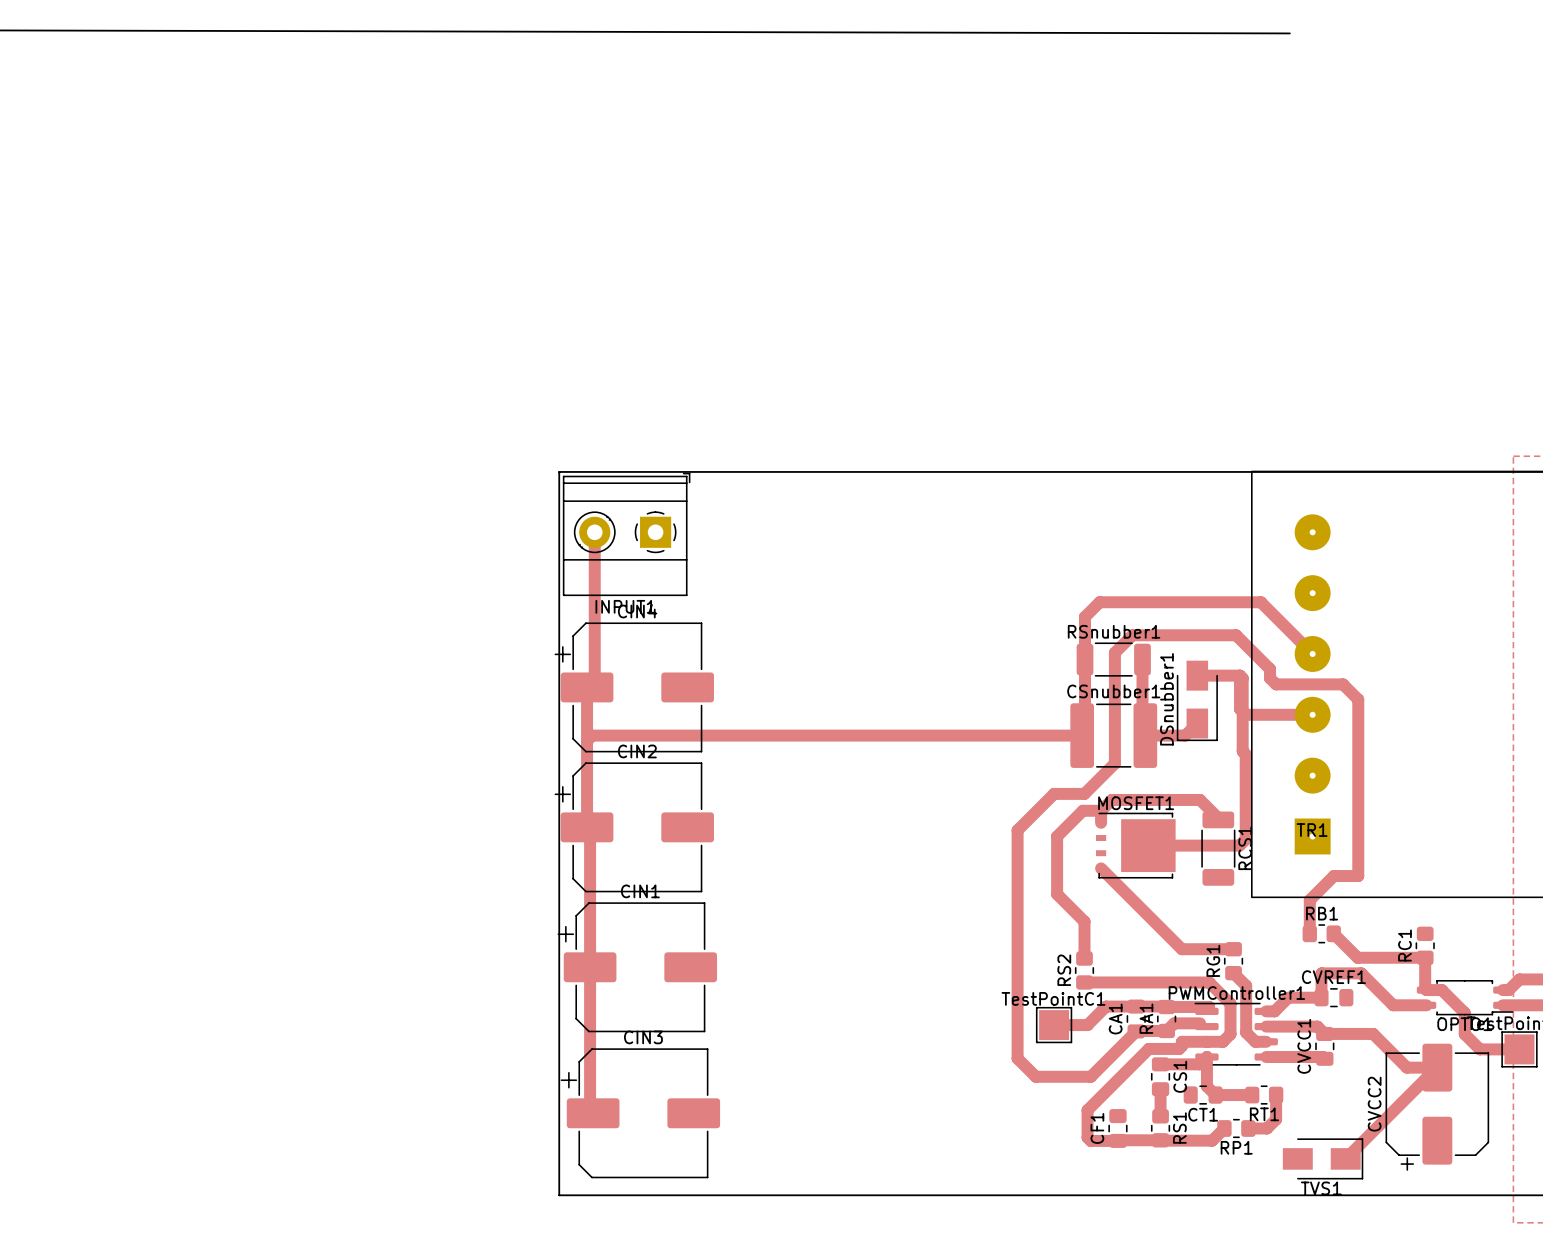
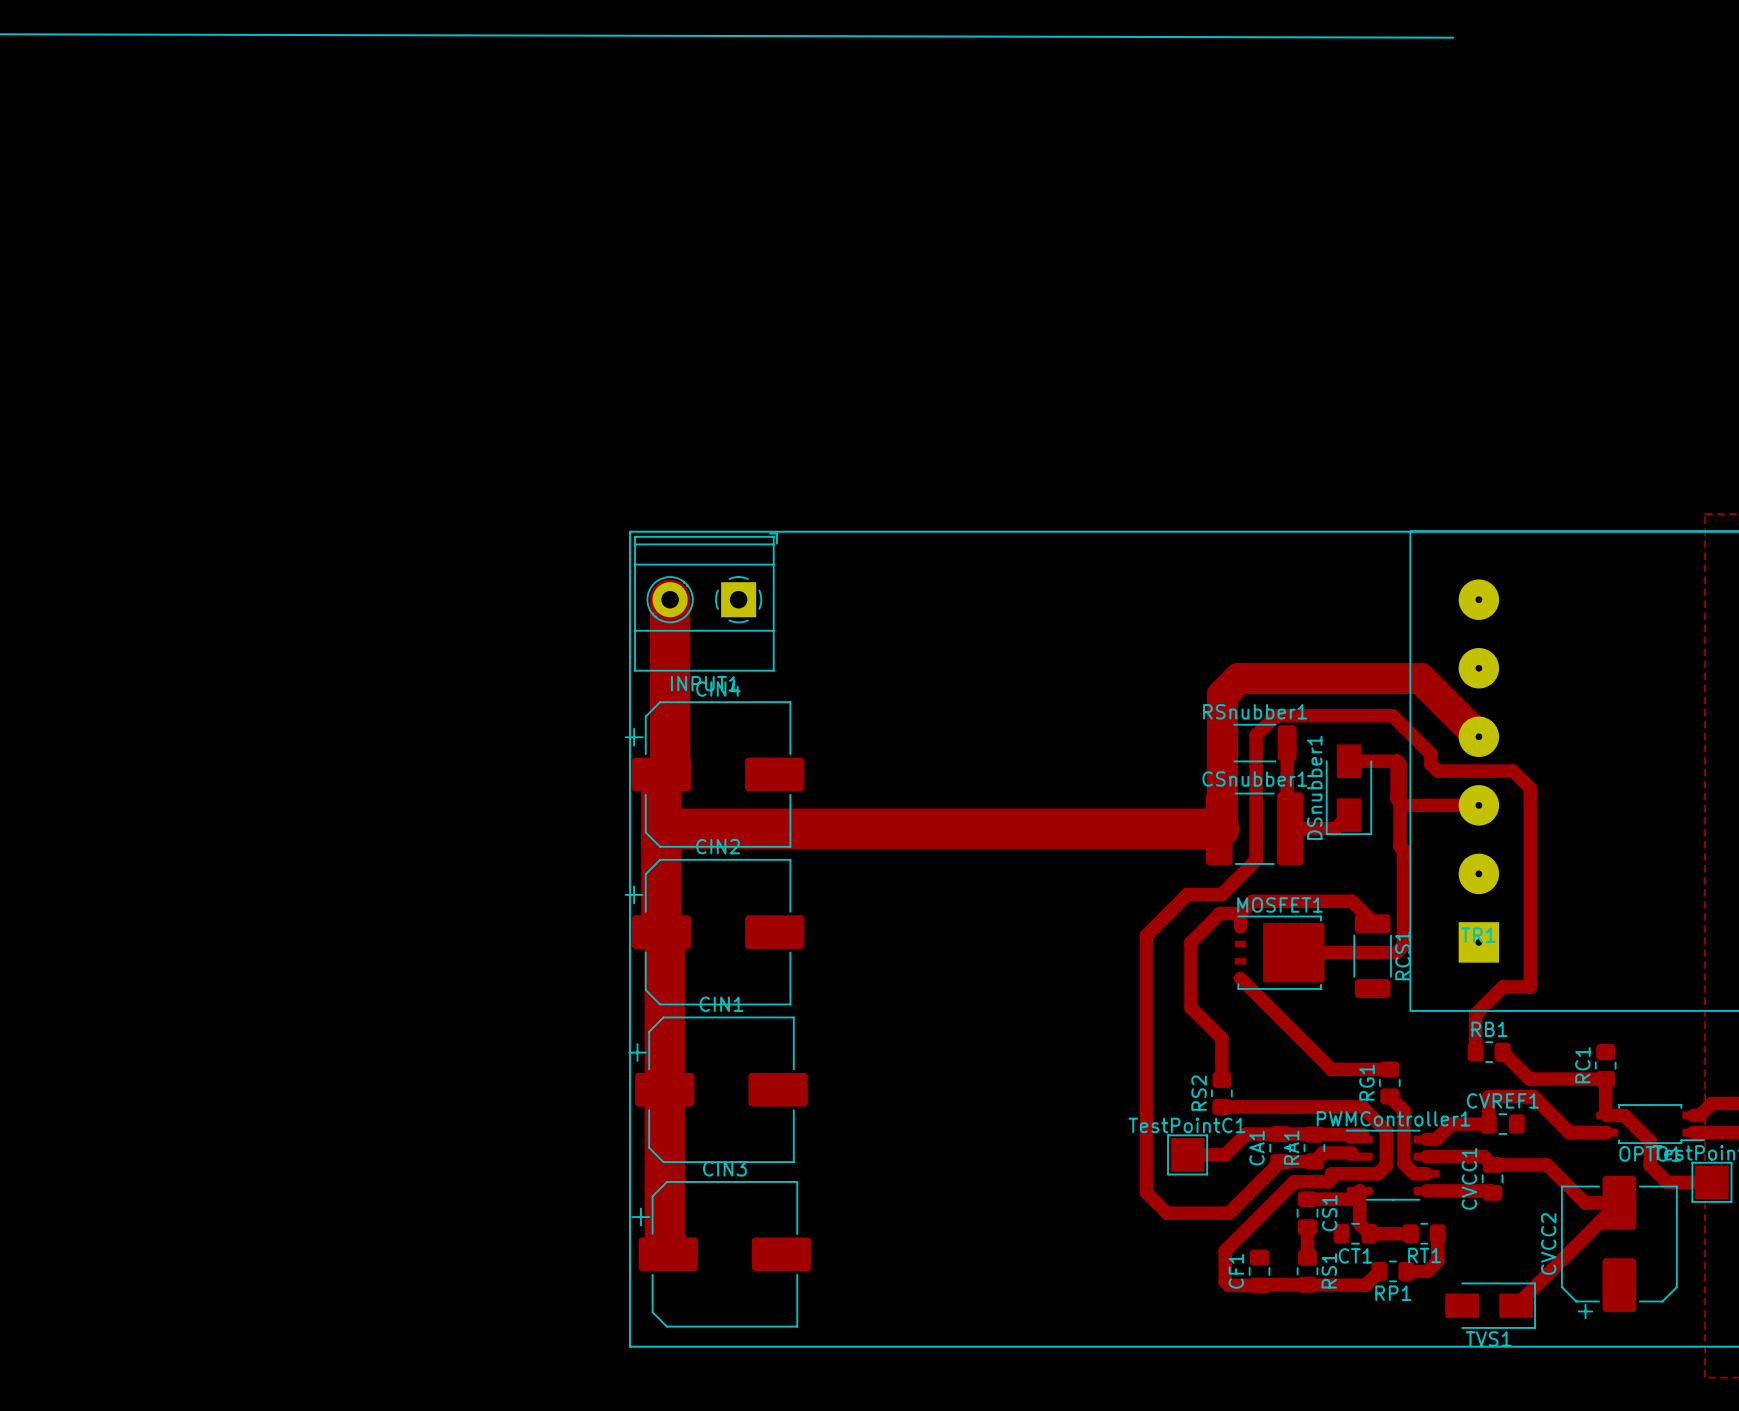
track width: thin (594, 532) (594, 679) -> thick (670, 599) (670, 765)
track width: thin (1312, 653) (1260, 602) (1099, 602) (1085, 616) (1085, 732) -> thick (1478, 736) (1420, 678) (1238, 678) (1222, 695) (1222, 825)
track width: thin (587, 687) (587, 827) -> thick (661, 774) (661, 932)
track width: thin (592, 735) (1082, 735) -> thick (667, 828) (1219, 828)
track width: thin (590, 830) (590, 1110) -> thick (664, 935) (664, 1250)

